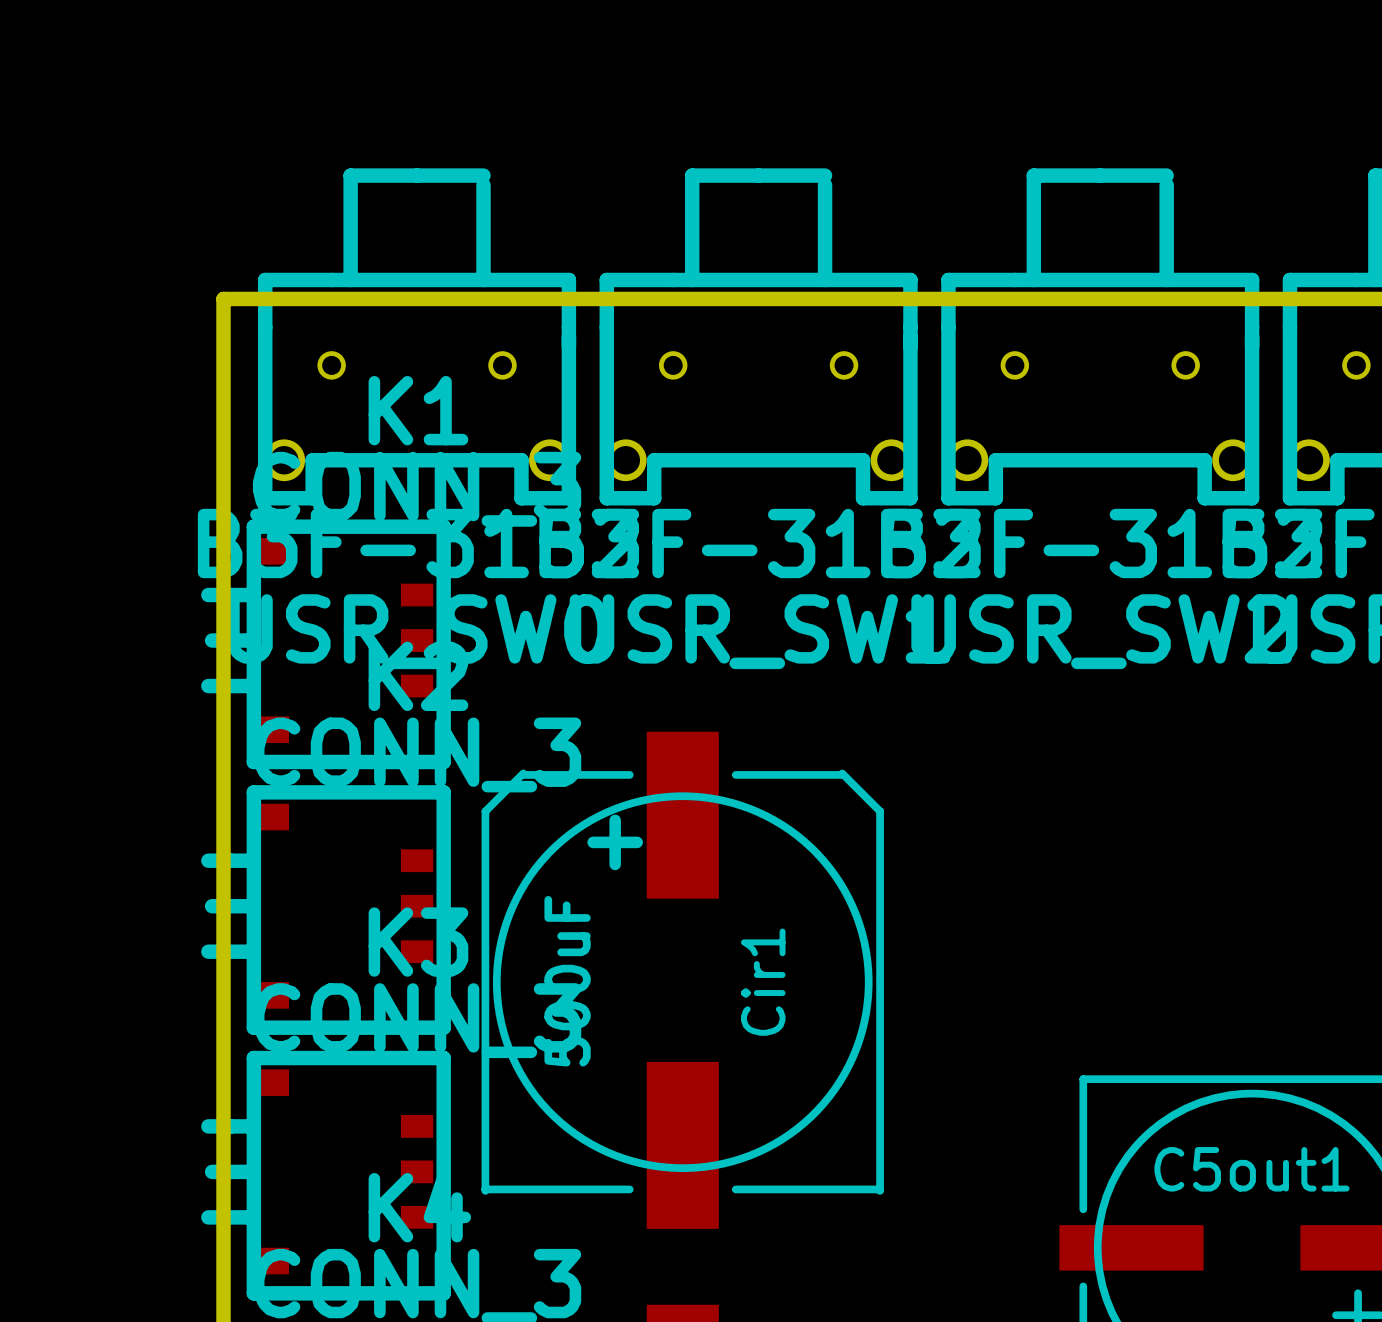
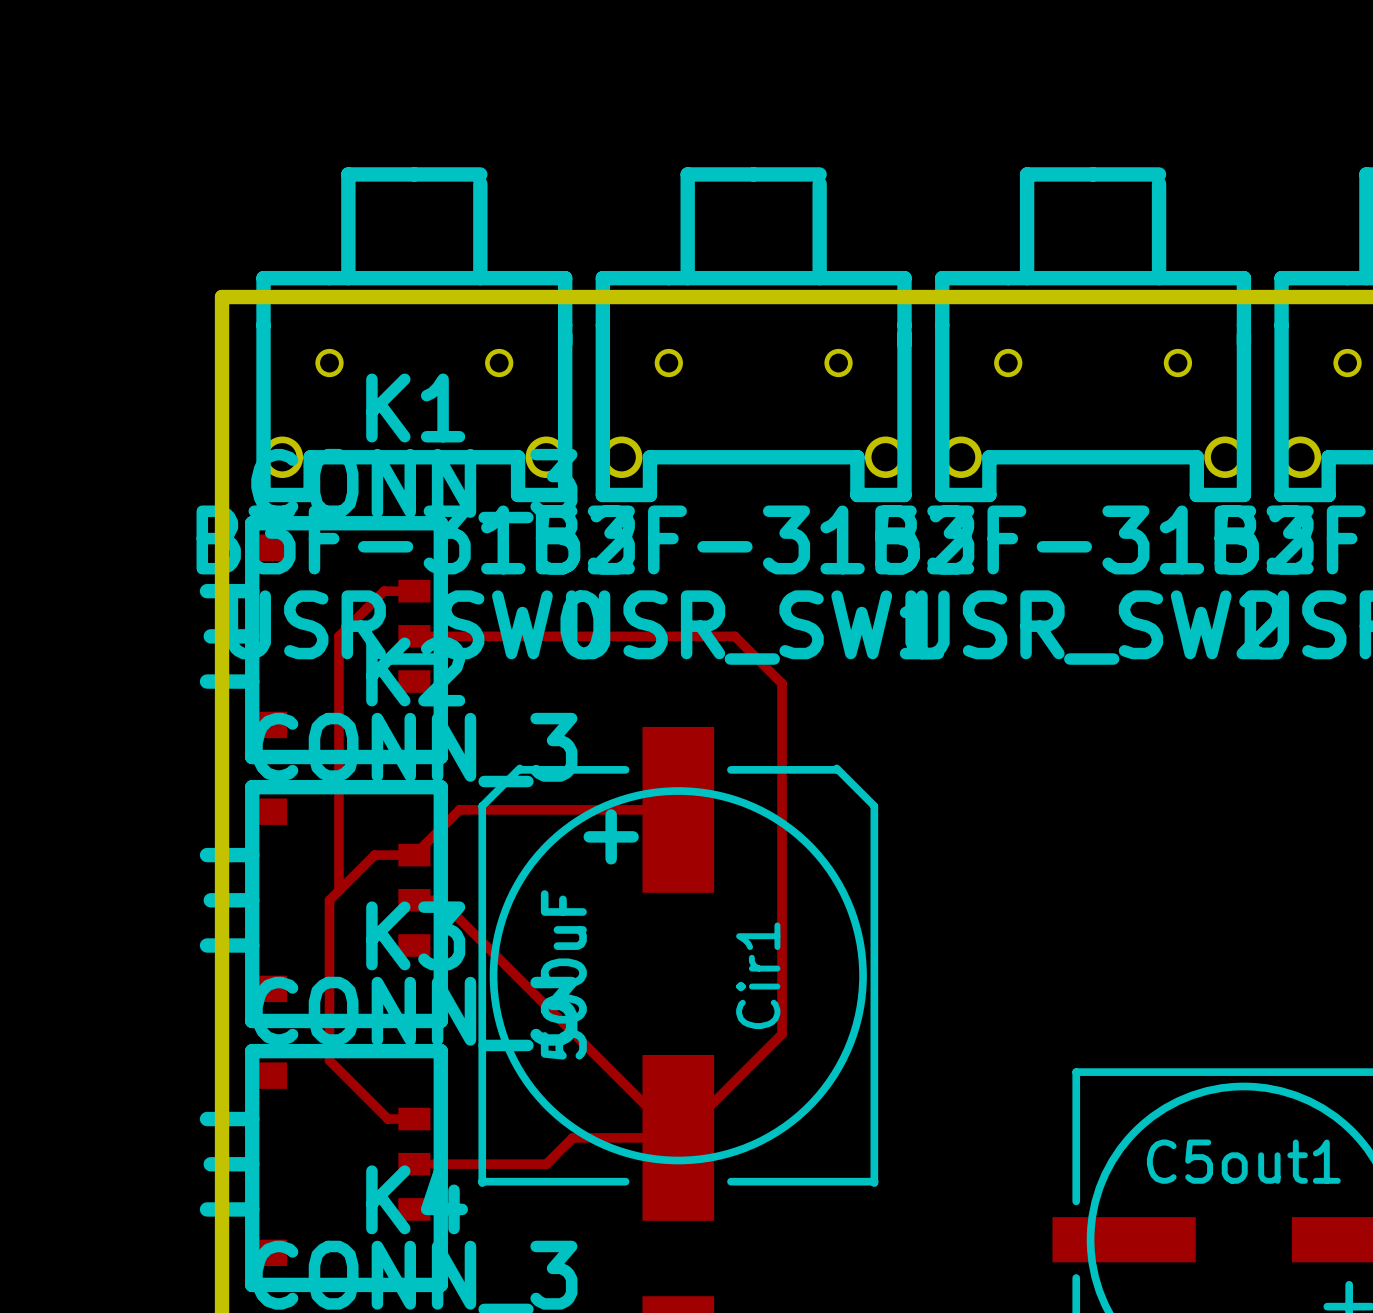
top track: none -> (414, 591) (384, 591) (338, 636) (338, 890)
top track: none -> (414, 636) (734, 636) (782, 683) (782, 1034) (678, 1137)
top track: none -> (678, 809) (459, 809) (414, 855) (374, 855) (329, 900) (329, 1060) (388, 1119) (414, 1119)
top track: none -> (414, 900) (440, 900) (678, 1137)
top track: none -> (678, 1137) (572, 1137) (546, 1164) (433, 1164)

